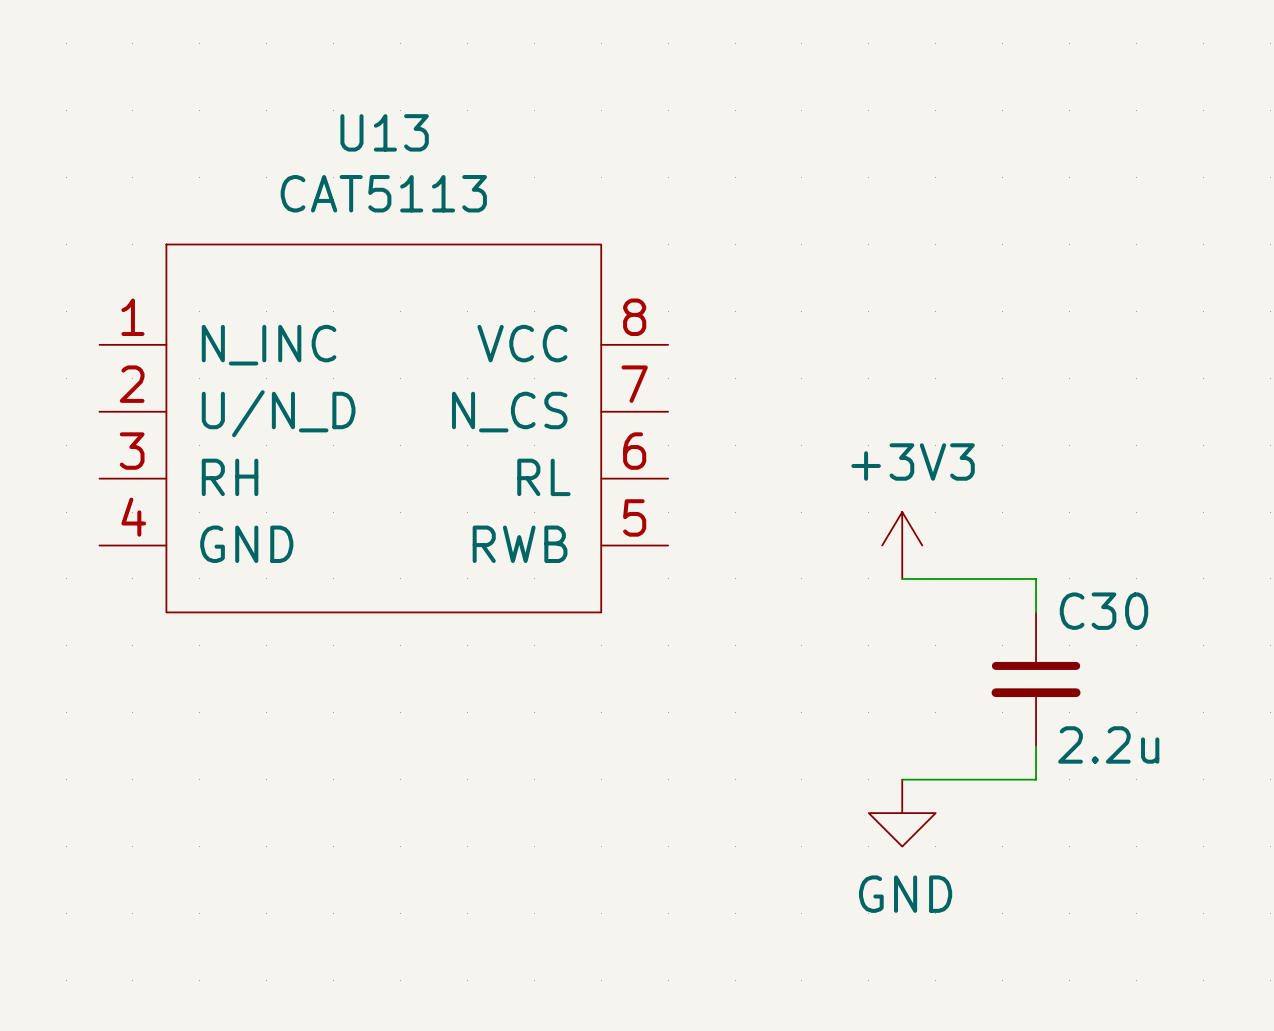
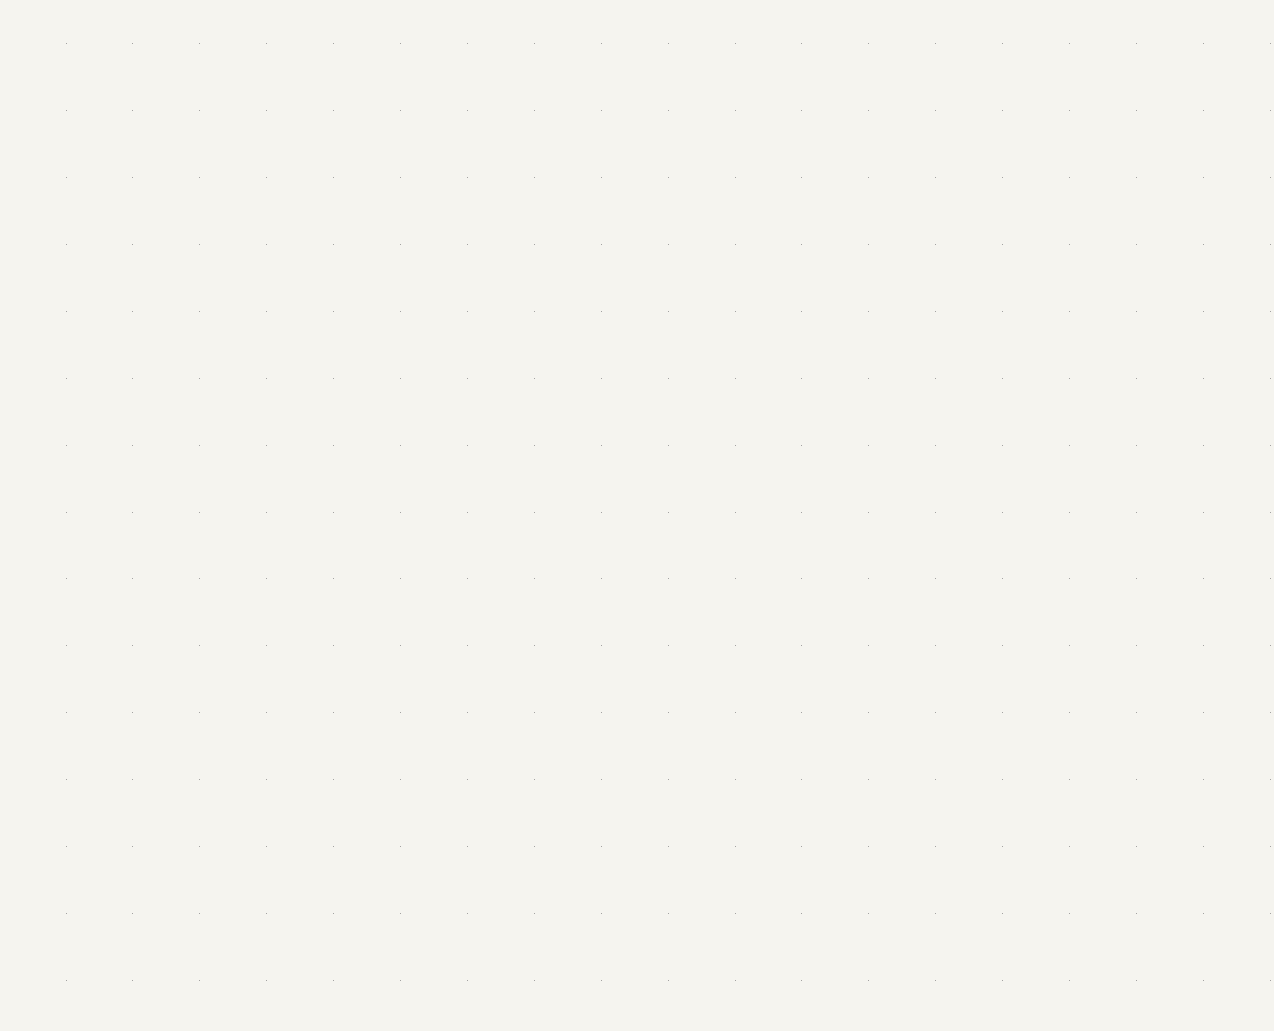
U13: CAT5113 (383, 428) -> none
power symbol: +3V3 (902, 545) -> none
wire: (902, 578) (1036, 578) (1036, 612) -> none
C30: 2.2u (1036, 679) -> none
wire: (1036, 746) (1036, 779) (902, 779) -> none
power symbol: GND (902, 813) -> none

